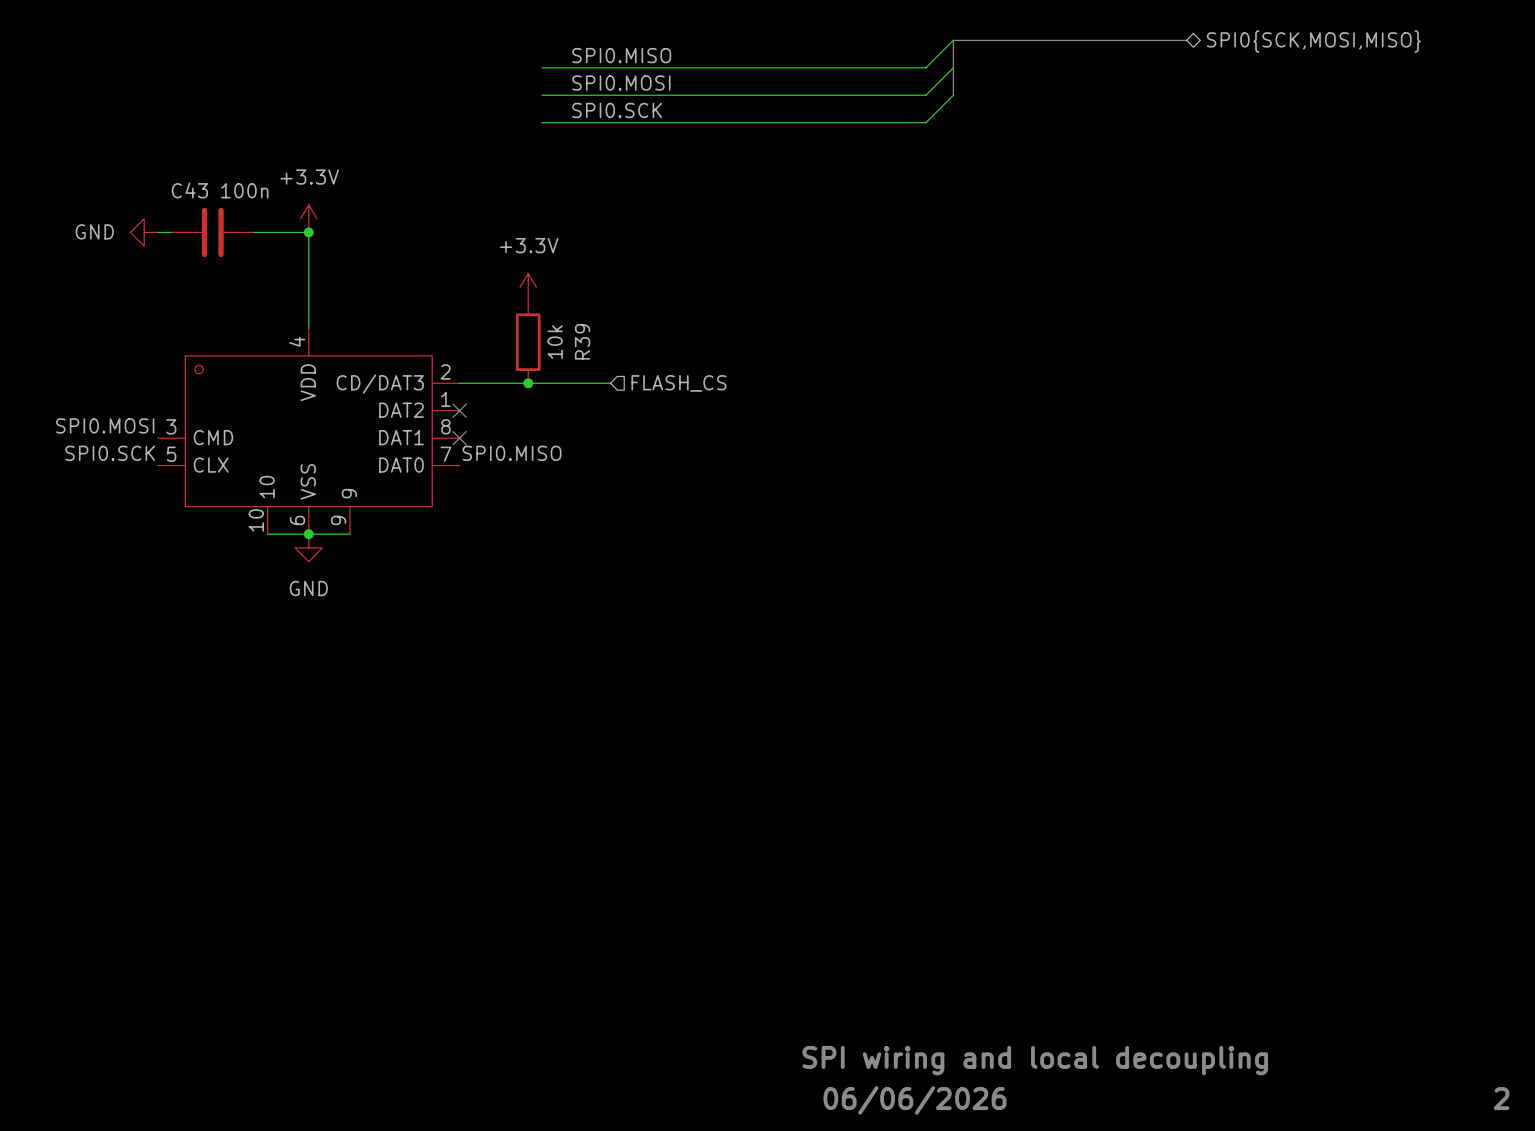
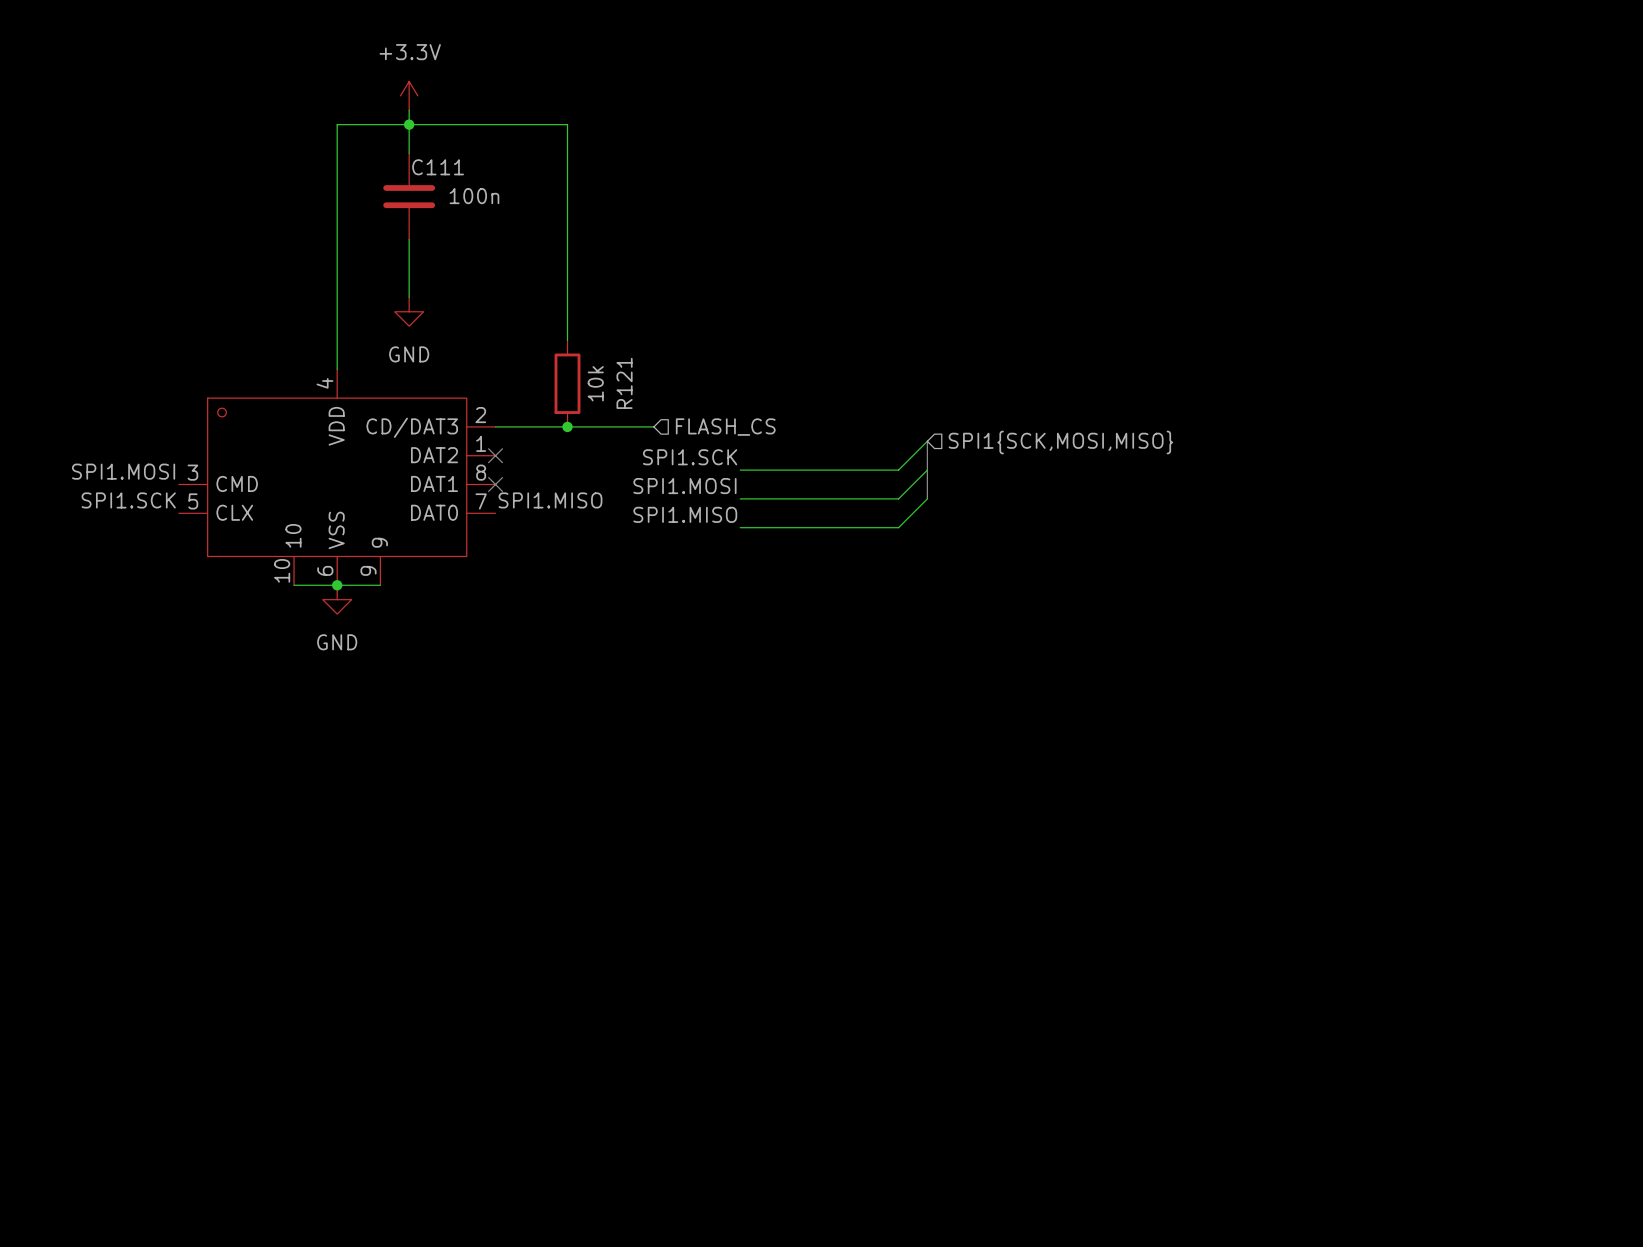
wire: (953, 40) (925, 67) (541, 67) -> none
bus: (1186, 40) (953, 40) (953, 95) -> none
hierarchical label: SPI0{SCK,MOSI,MISO} (1313, 41) -> none
label: SPI0.MISO (621, 55) -> none
power symbol: none -> +3.3V (409, 95)
wire: (953, 67) (925, 95) (541, 95) -> none
wire: none -> (409, 110) (409, 153)
label: SPI0.MOSI (621, 83) -> none
junction: none -> (409, 124)
wire: (953, 95) (925, 122) (541, 122) -> none
label: SPI0.SCK (617, 110) -> none
C111: none -> 100n (409, 196)
wire: none -> (409, 239) (409, 297)
power symbol: +3.3V (308, 218) -> none
power symbol rotation: 0° (144, 232) -> 90° counterclockwise (409, 311)
power symbol position: GND (144, 232) -> GND (409, 311)
wire: (157, 232) (171, 232) -> none
C43: 100n (212, 232) -> none
wire: (253, 232) (308, 232) -> (567, 340) (567, 124) (337, 124) (337, 268)
junction: (308, 232) -> none
power symbol: +3.3V (528, 287) -> none
R39 name: R39 (582, 341) -> R121 (624, 383)
wire: none -> (927, 441) (898, 470) (740, 470)
bus: none -> (927, 441) (927, 498)
hierarchical label: none -> SPI1{SCK,MOSI,MISO} (1060, 442)
label: none -> SPI1.SCK (690, 457)
wire: none -> (927, 470) (898, 498) (740, 498)
label: SPI0.MOSI (105, 425) -> SPI1.MOSI (123, 471)
label: none -> SPI1.MOSI (684, 486)
wire: none -> (927, 498) (898, 527) (740, 527)
label: SPI0.SCK (110, 453) -> SPI1.SCK (128, 500)
label: SPI0.MISO (512, 453) -> SPI1.MISO (550, 500)
label: none -> SPI1.MISO (685, 514)
text: SPI wiring and local decoupling (1035, 1060) -> none
text: 2 (1501, 1098) -> none
text: 06/06/2026 (915, 1100) -> none

